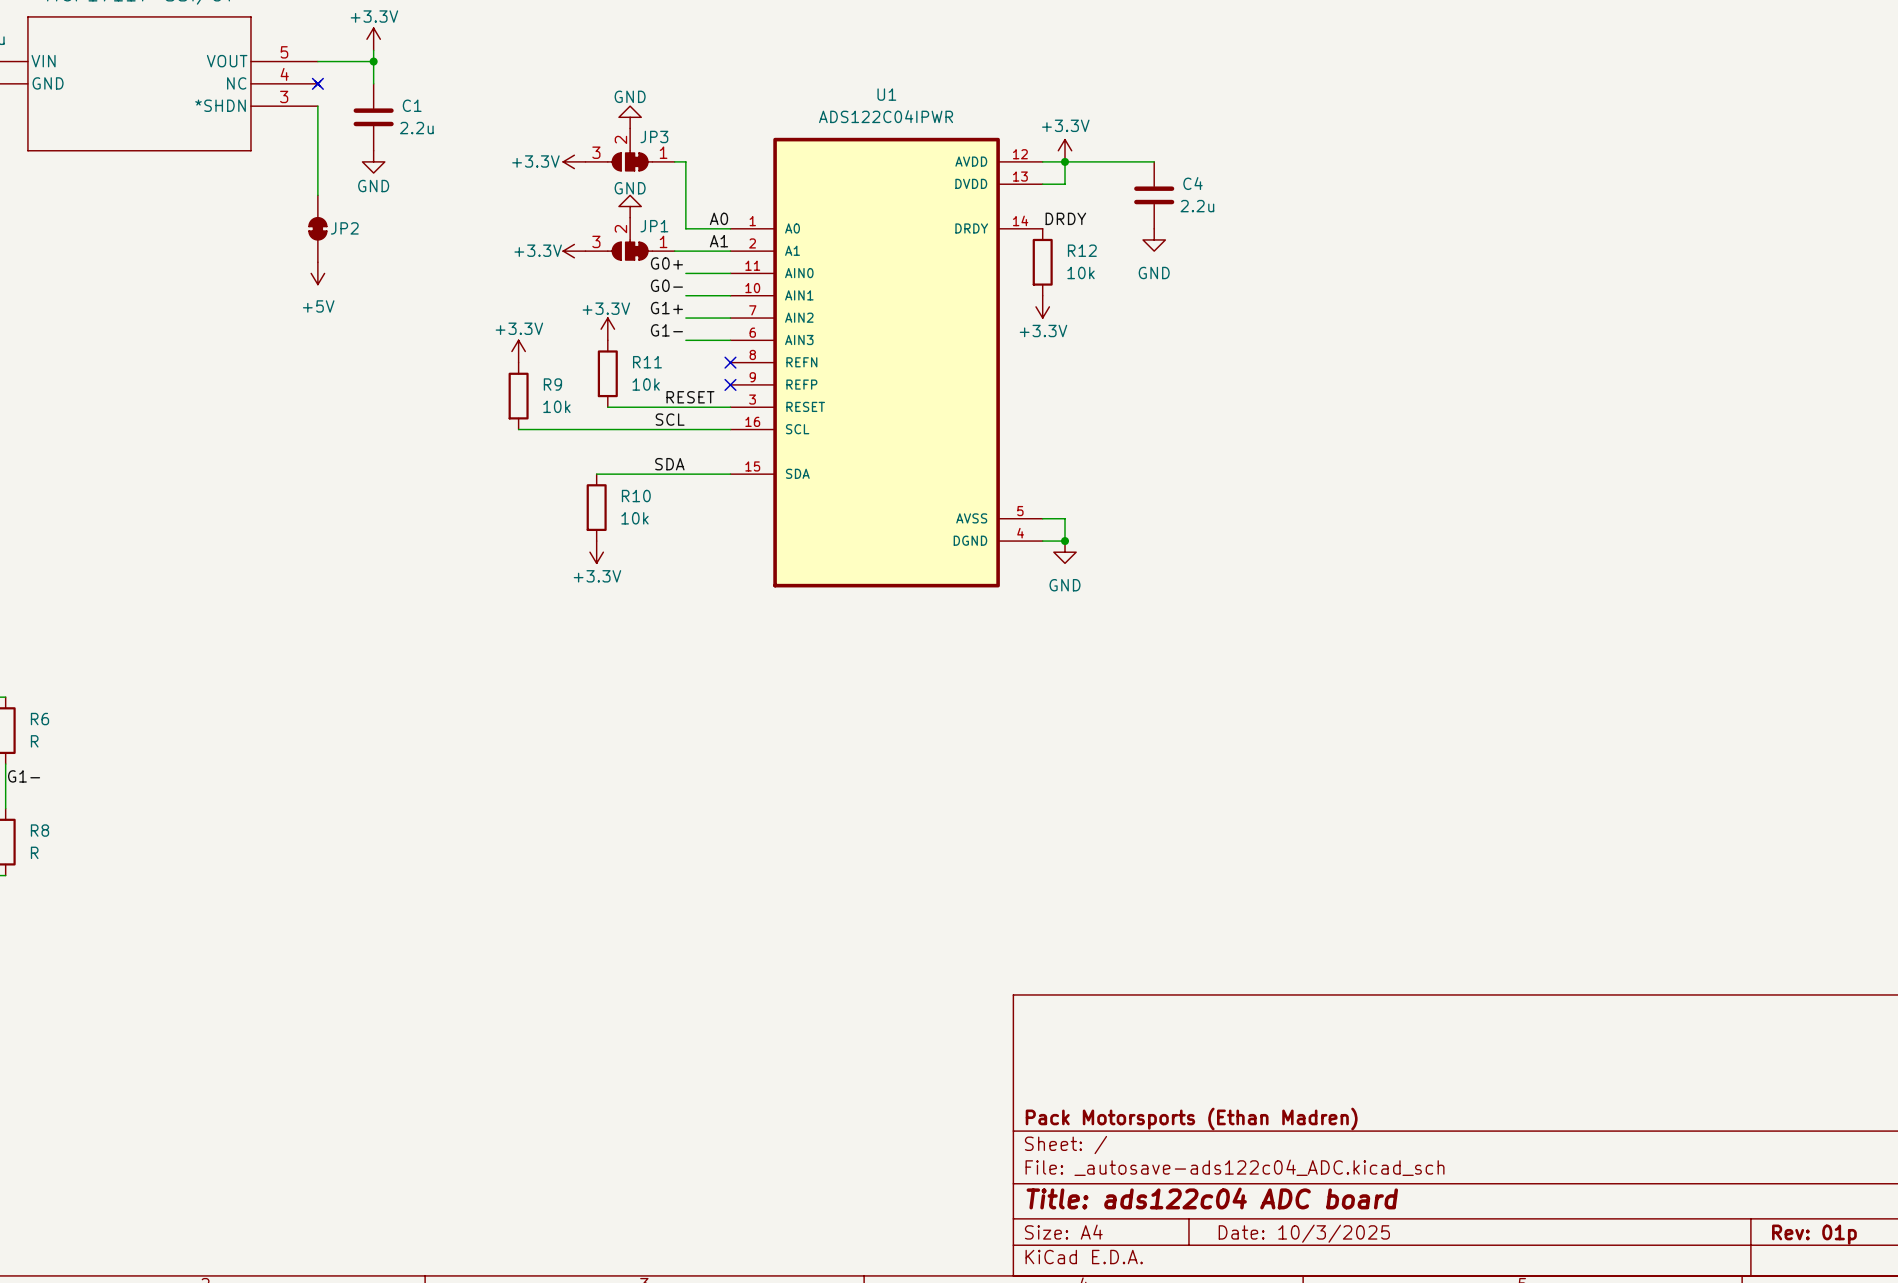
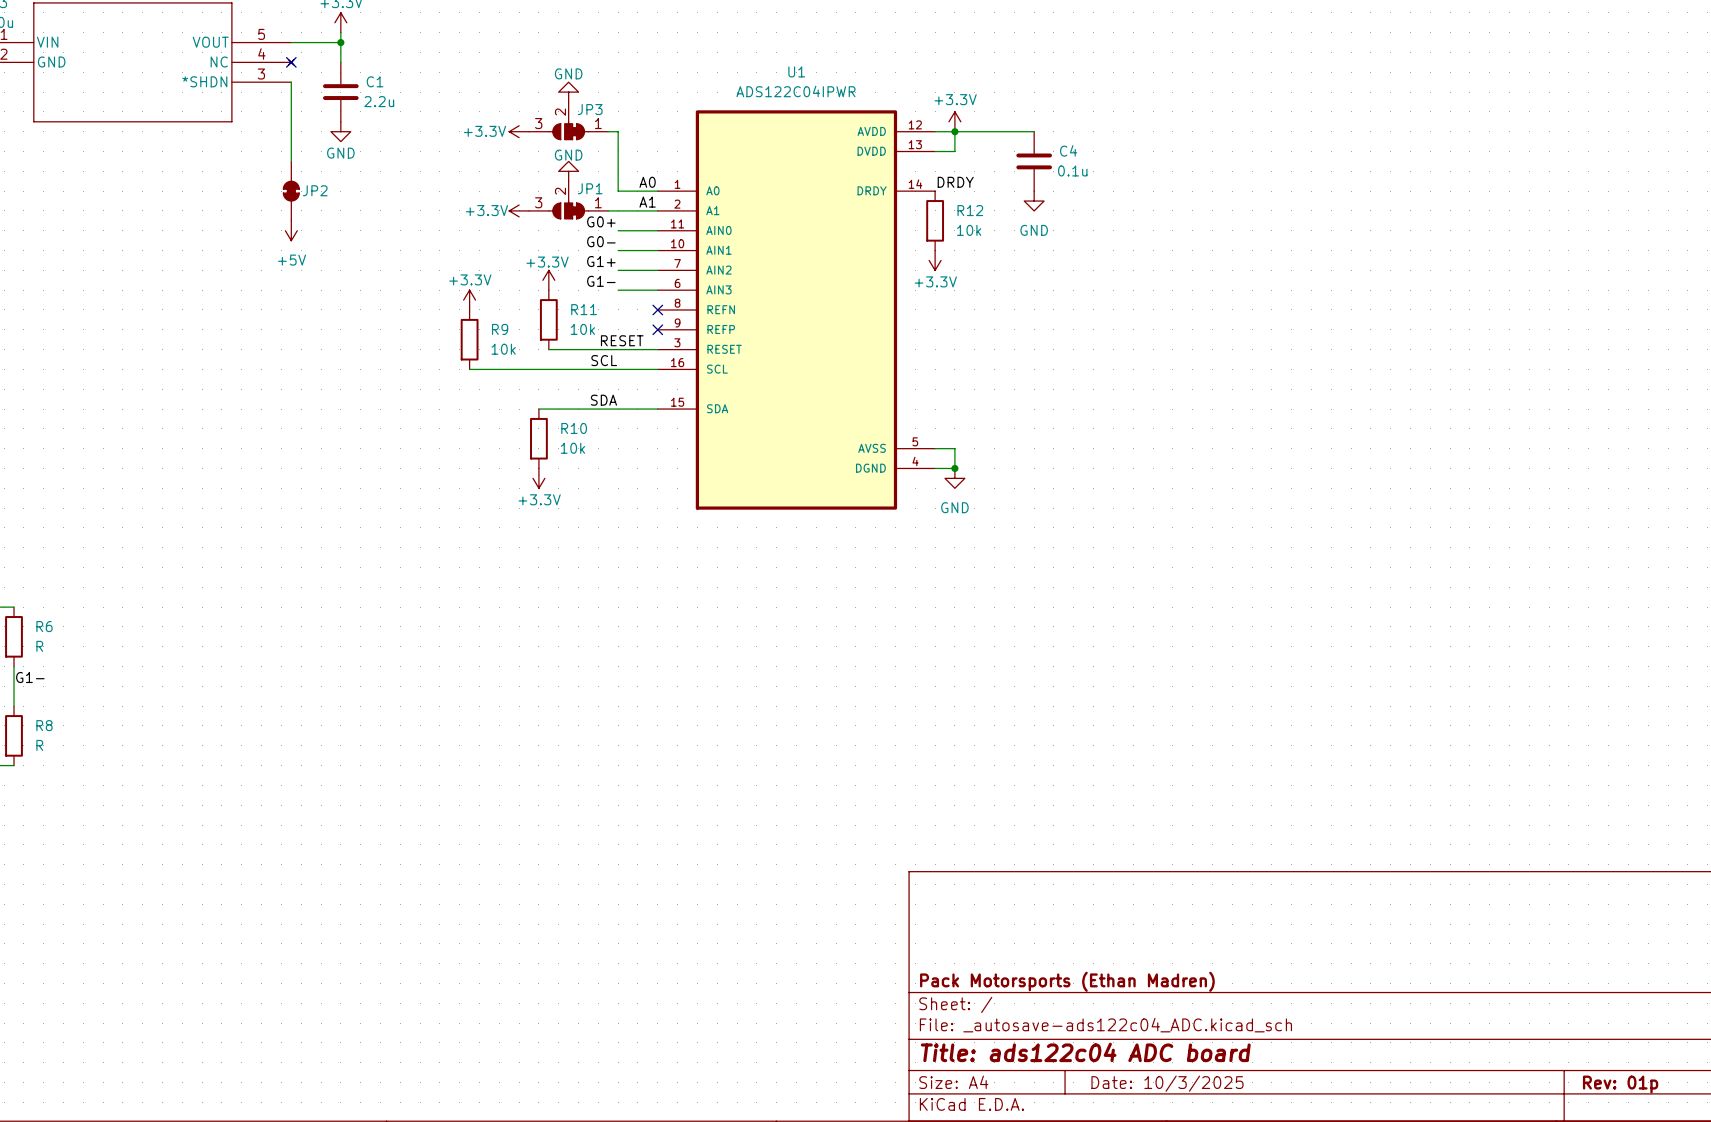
C4 value: 2.2u (1197, 206) -> 0.1u (1072, 170)

